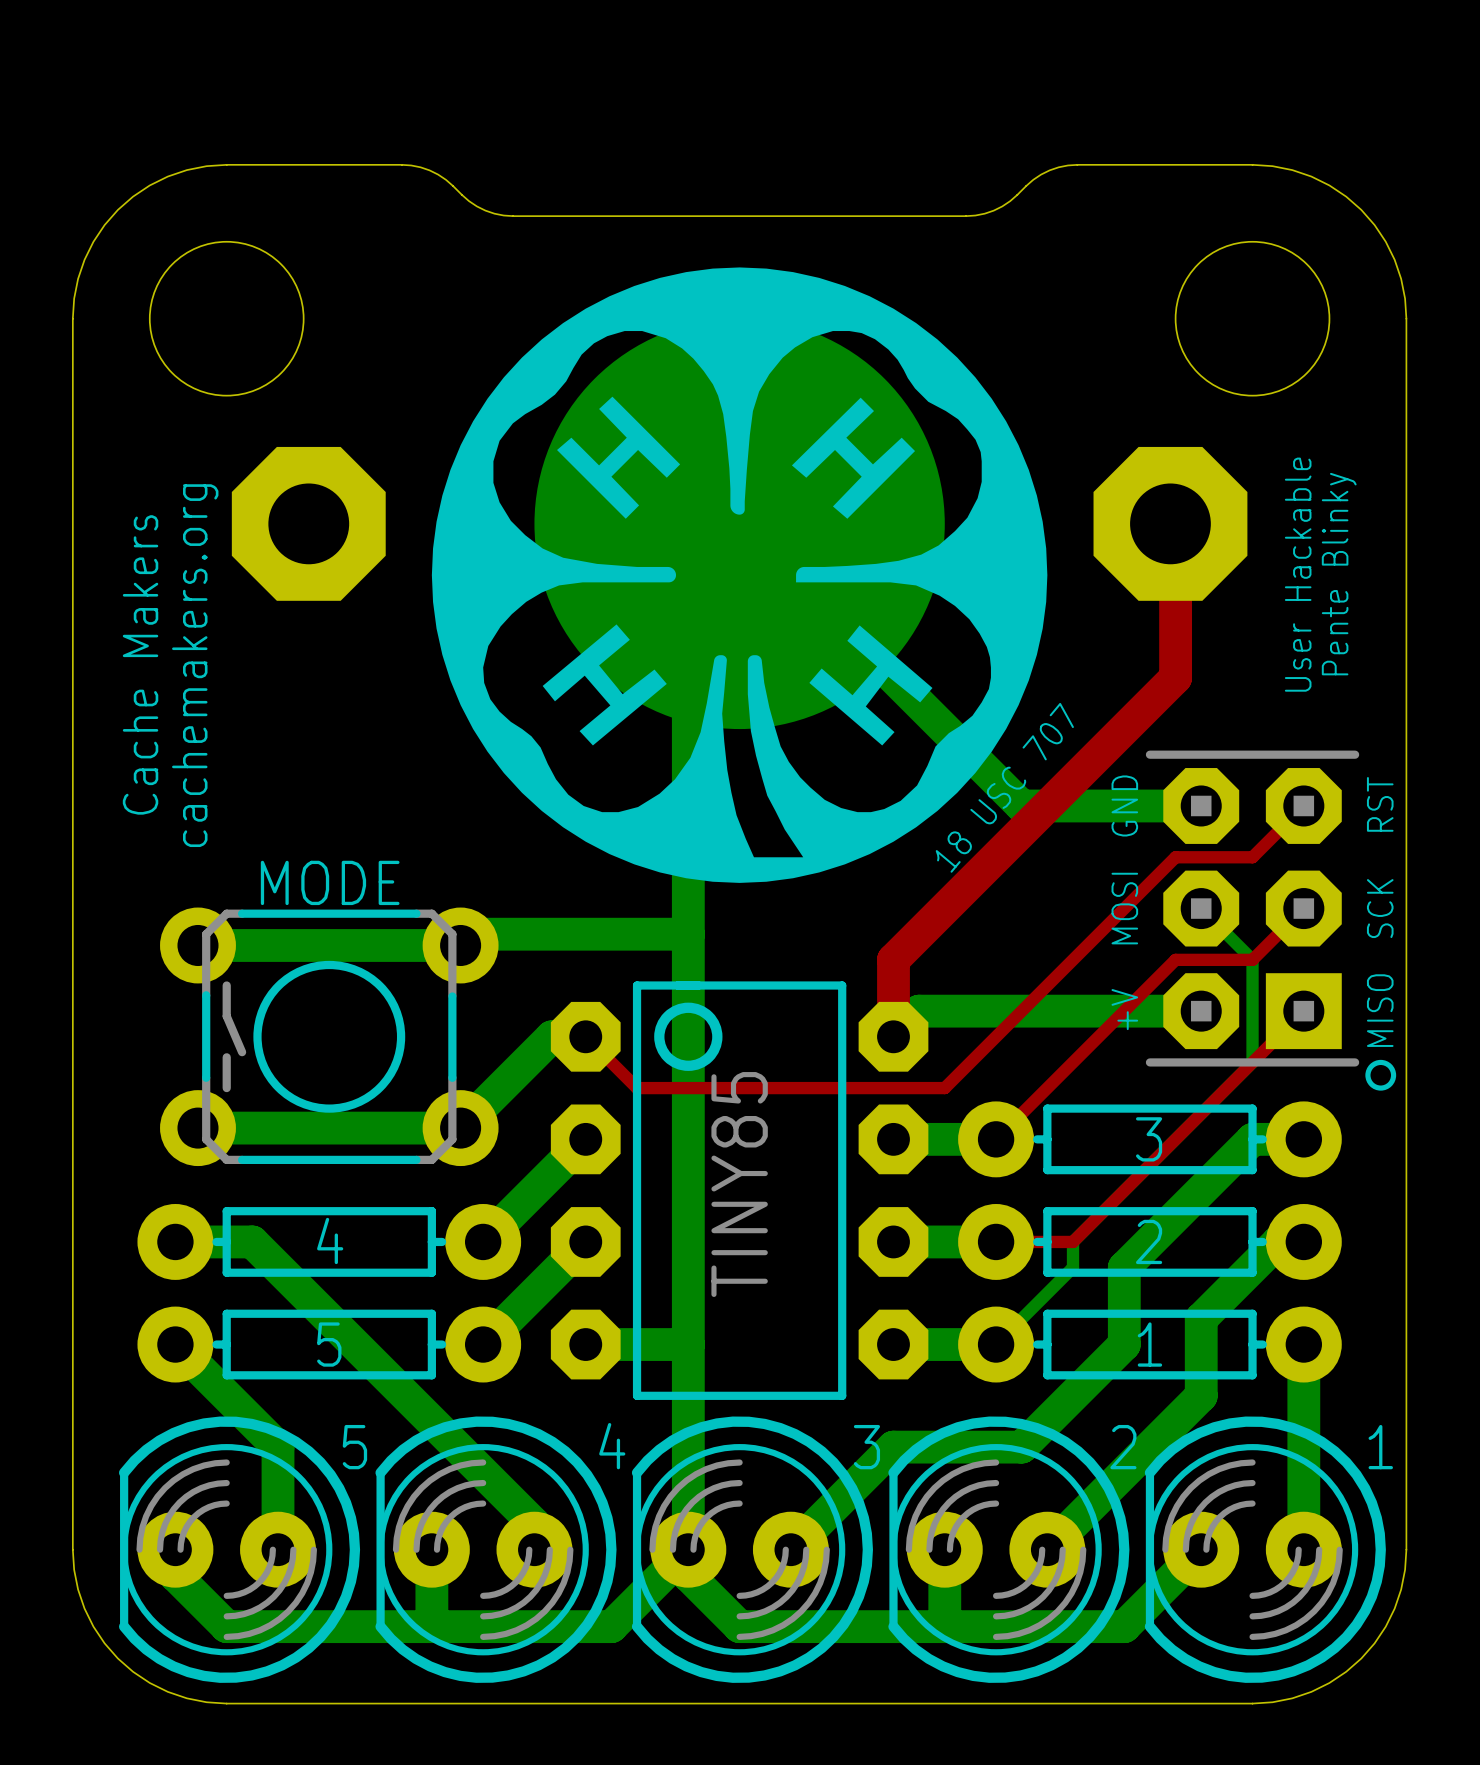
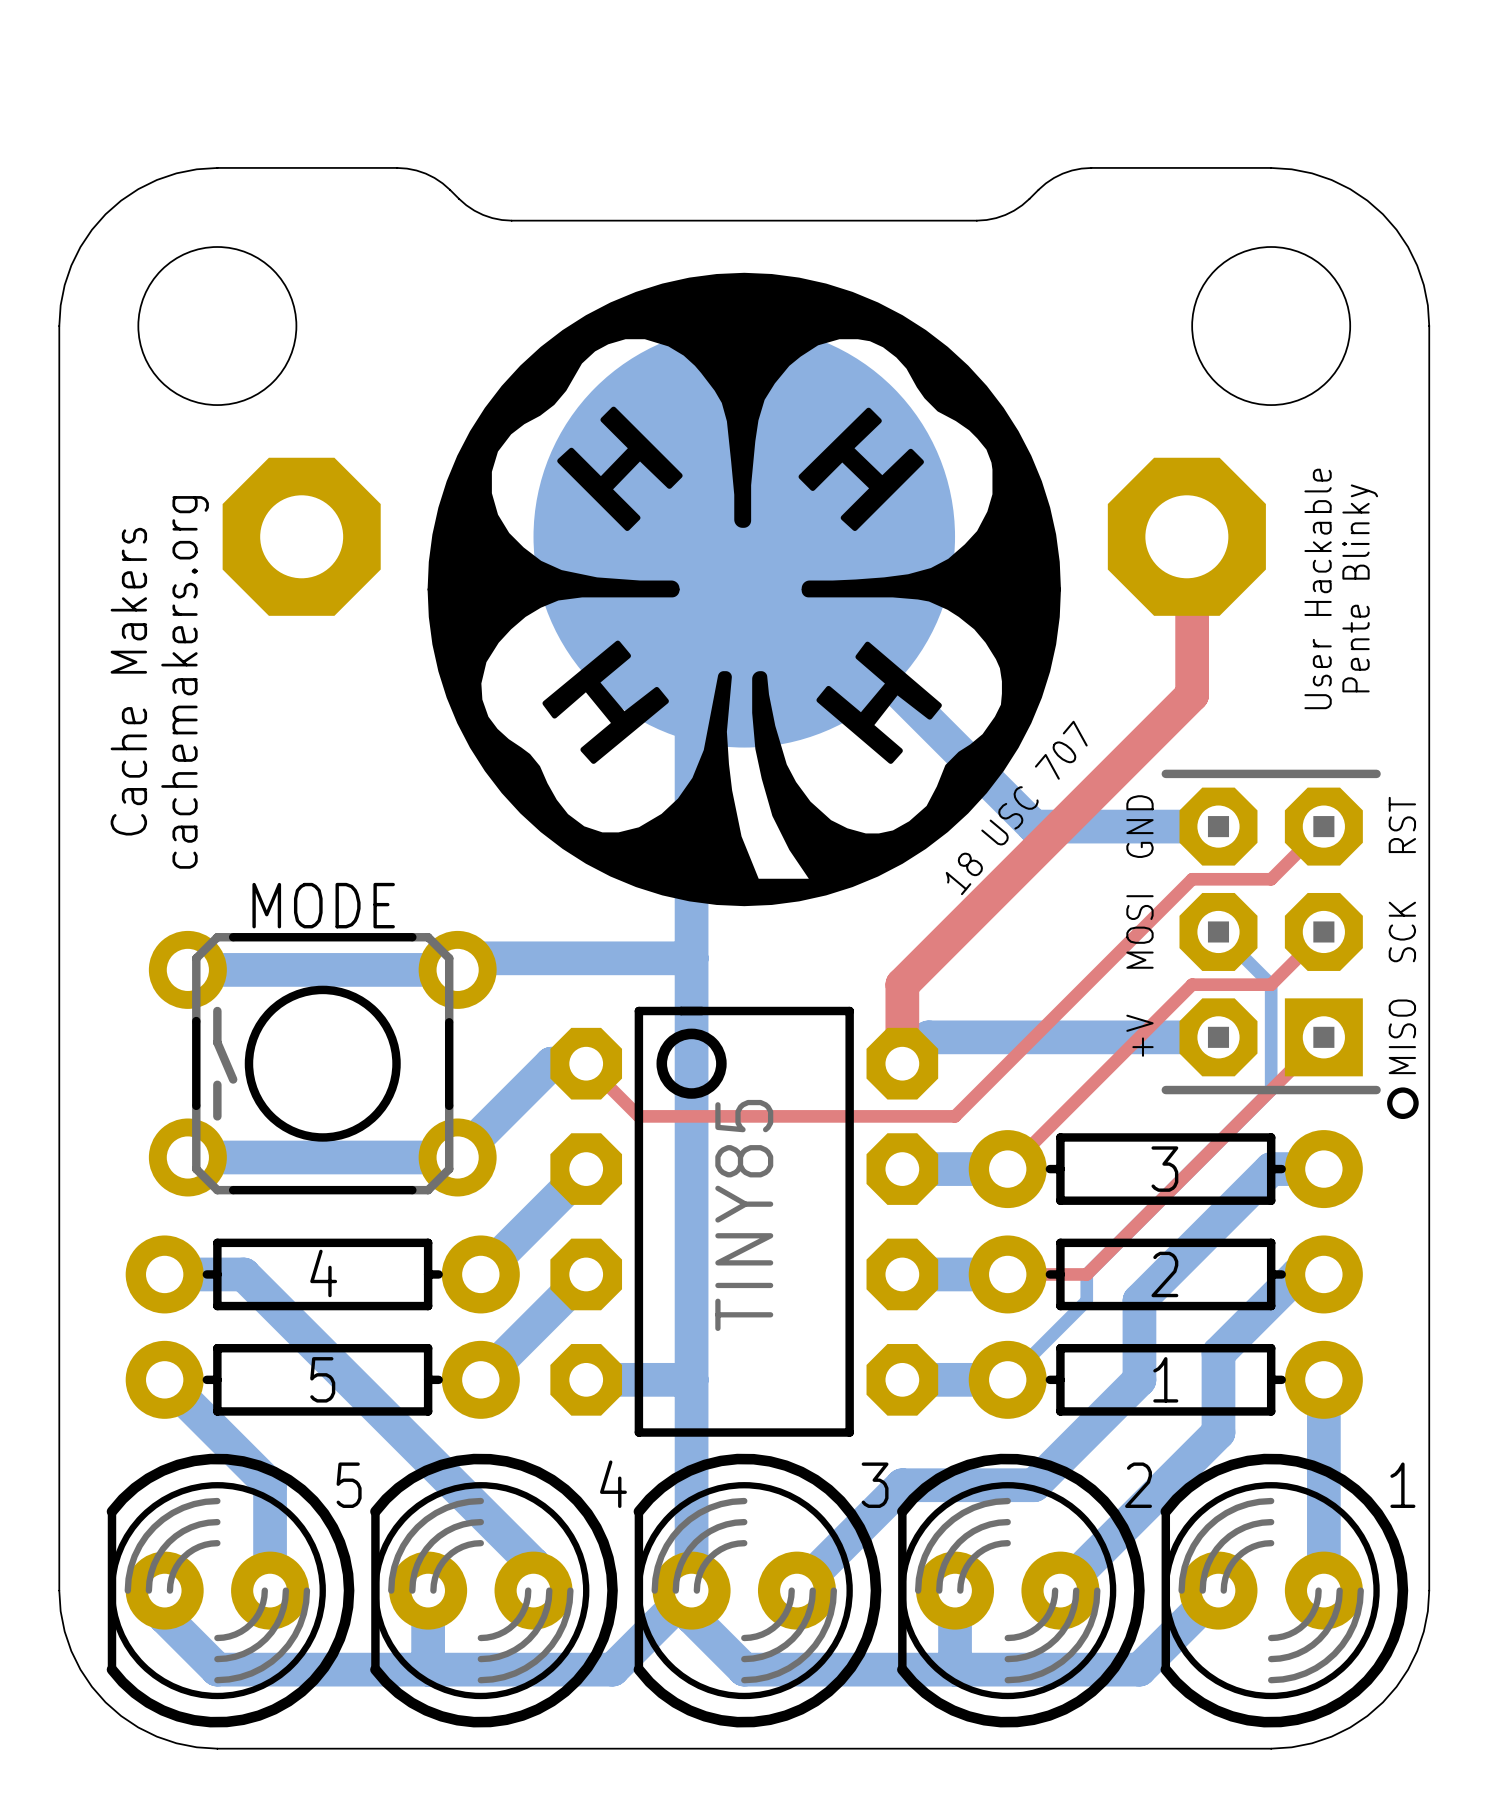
drawing shape: [431, 267, 1048, 883] -> [427, 272, 1061, 907]

